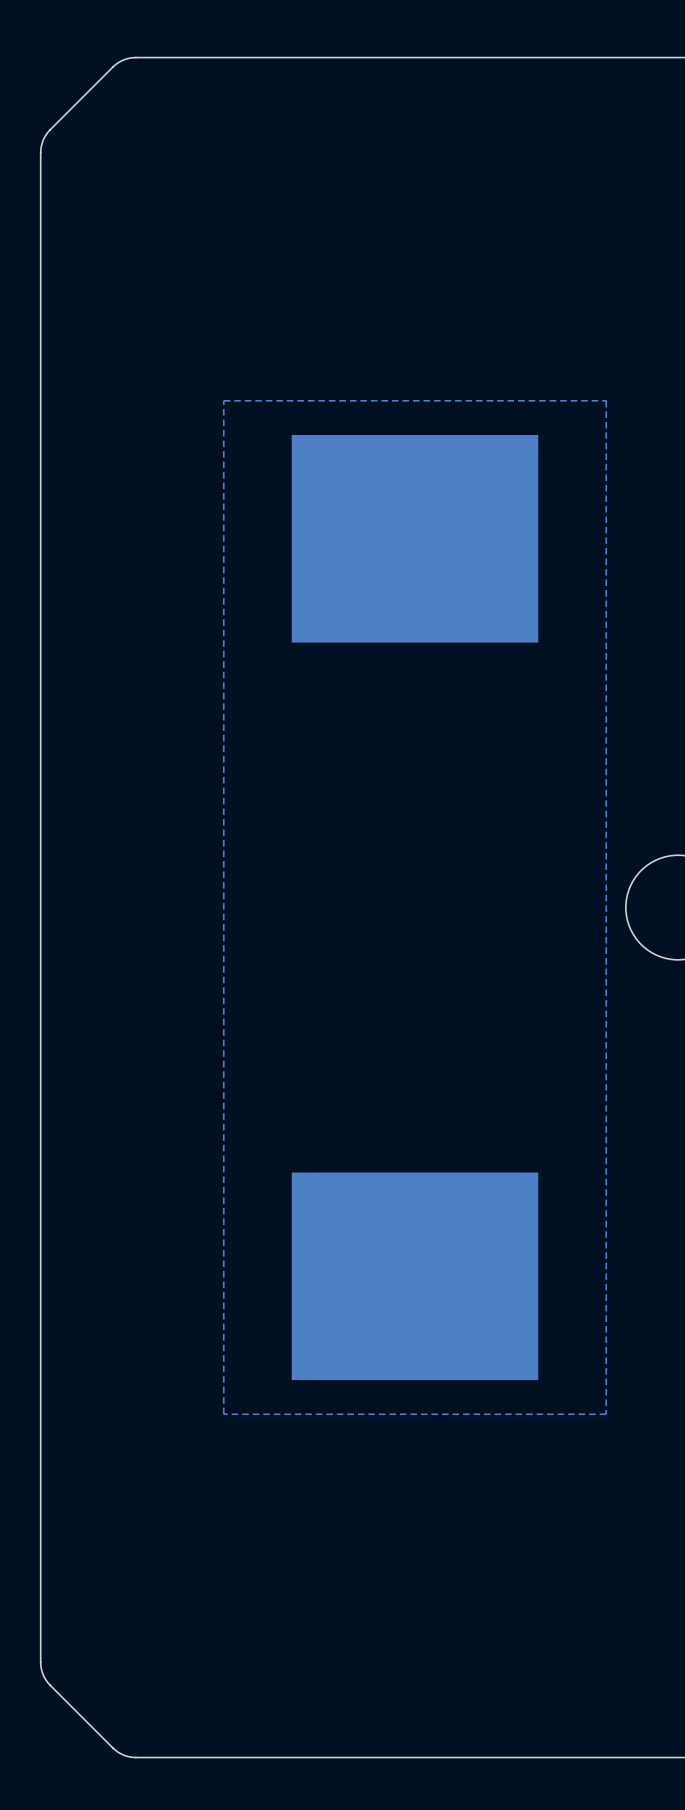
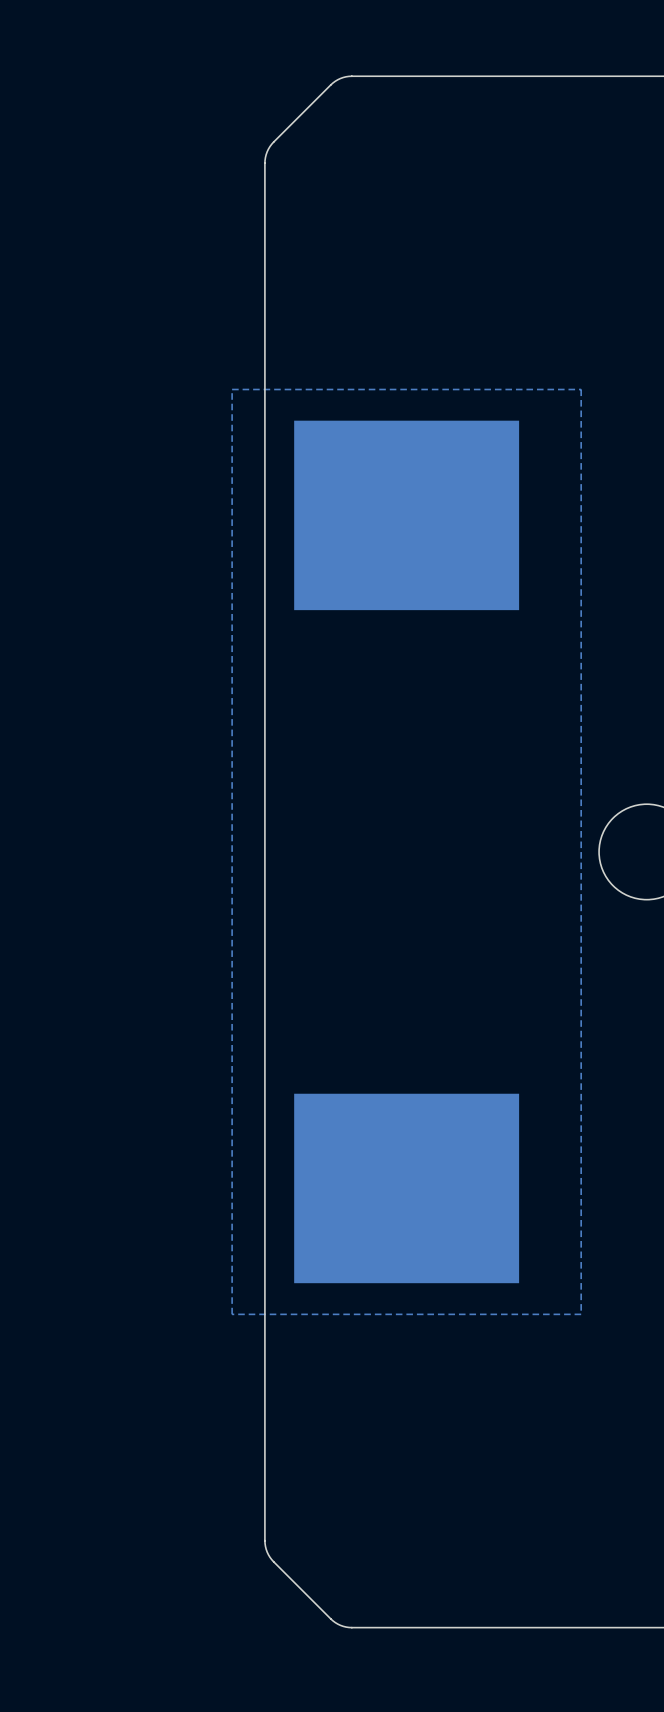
board edge: (354, 57) (126, 58) (112, 67) (50, 129) (43, 140) (40, 152) (41, 1668) (50, 1685) (112, 1747) (126, 1756) (354, 1757) -> (351, 76) (343, 77) (332, 83) (273, 142) (267, 151) (264, 163) (265, 1543) (271, 1559) (330, 1618) (340, 1625) (351, 1627)

